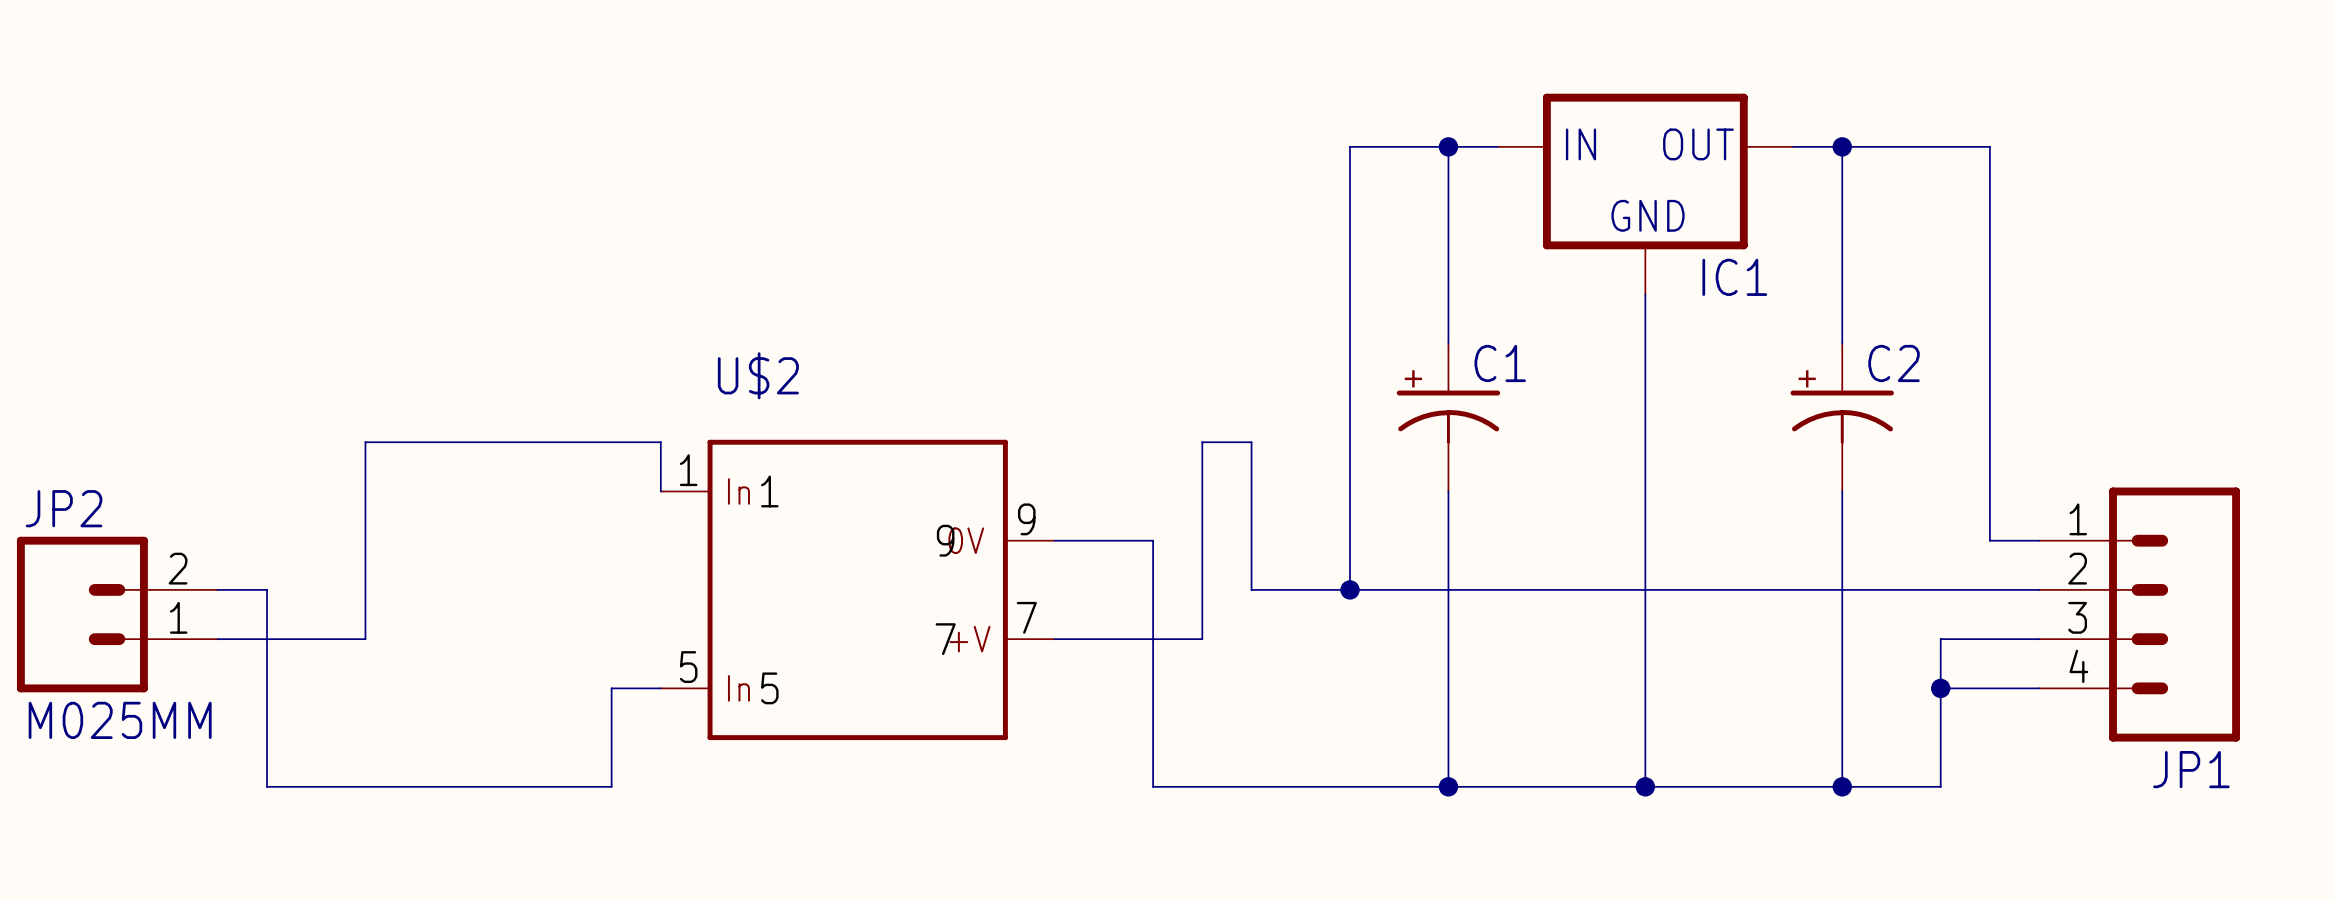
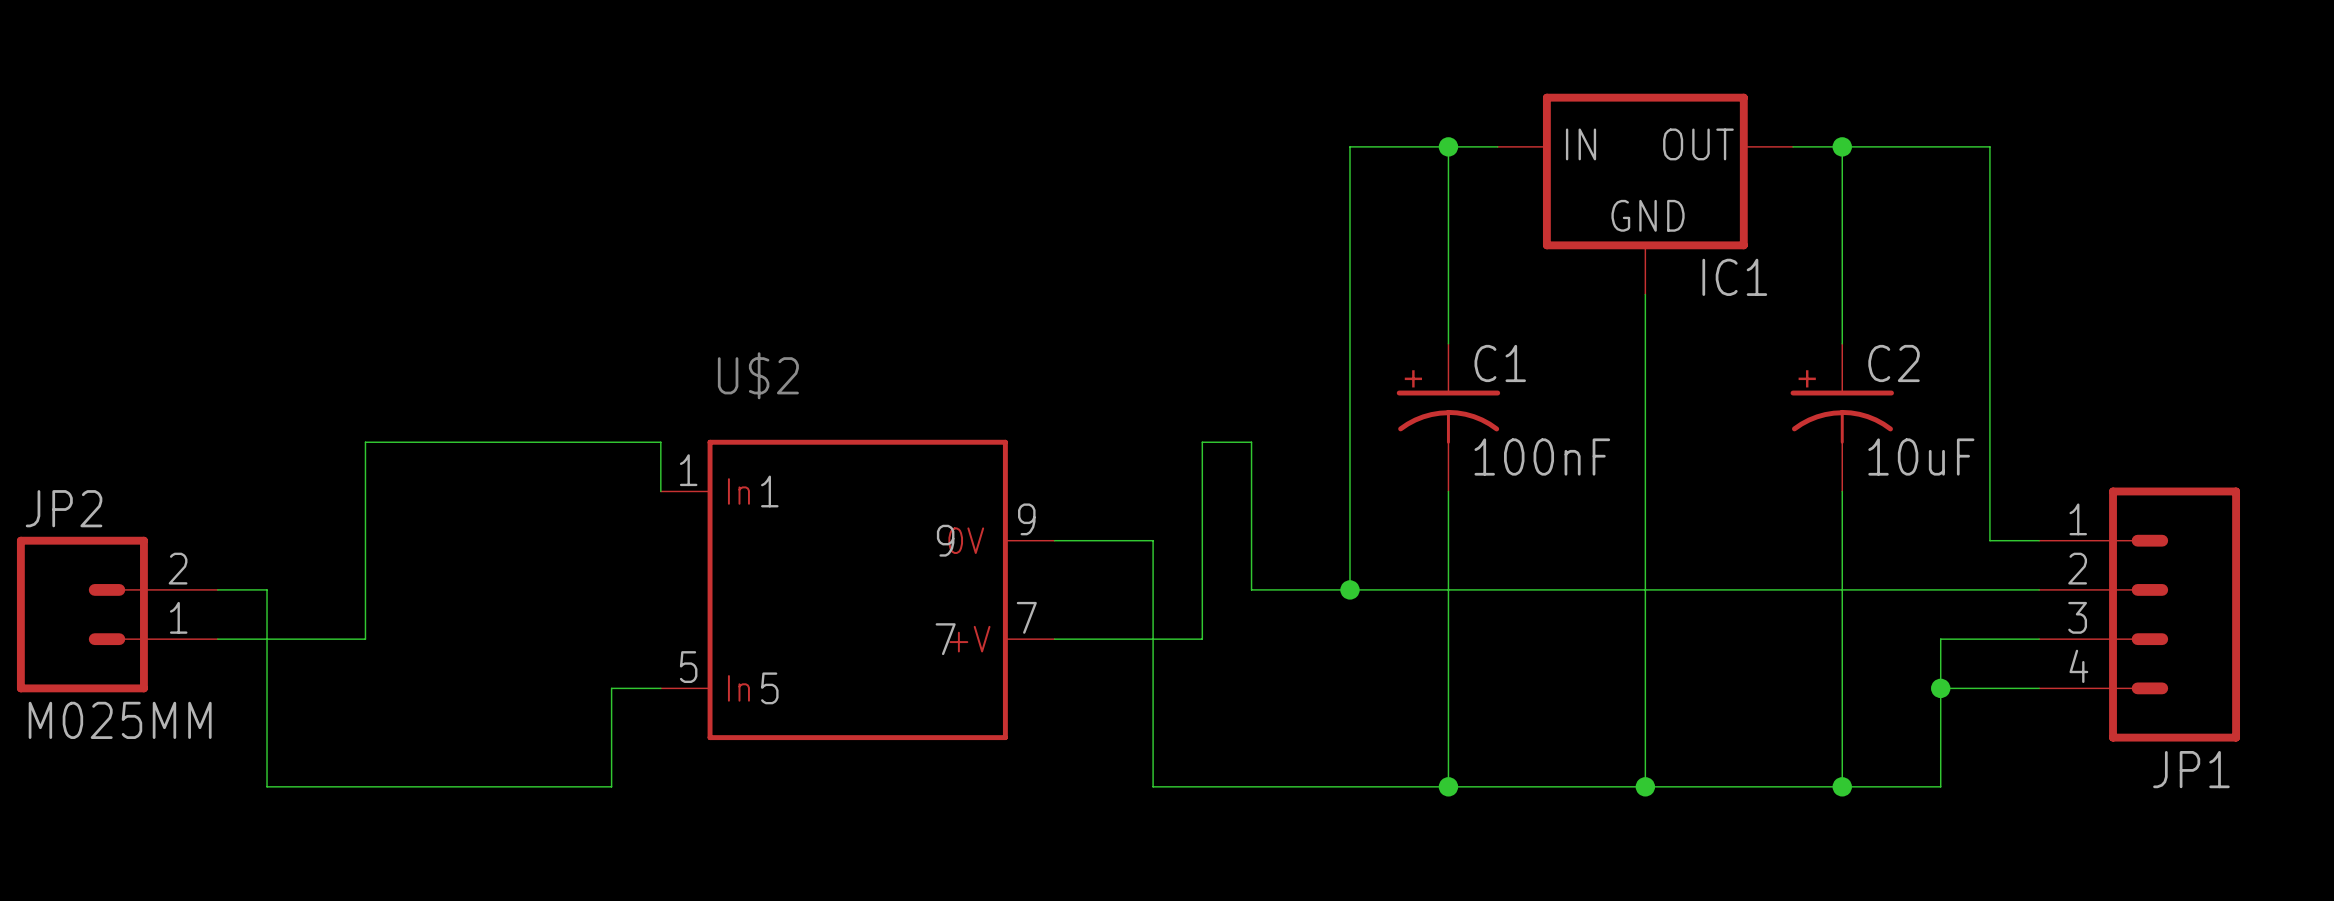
C1 value: none -> 100nF (1542, 457)
C2 value: none -> 10uF (1921, 457)

